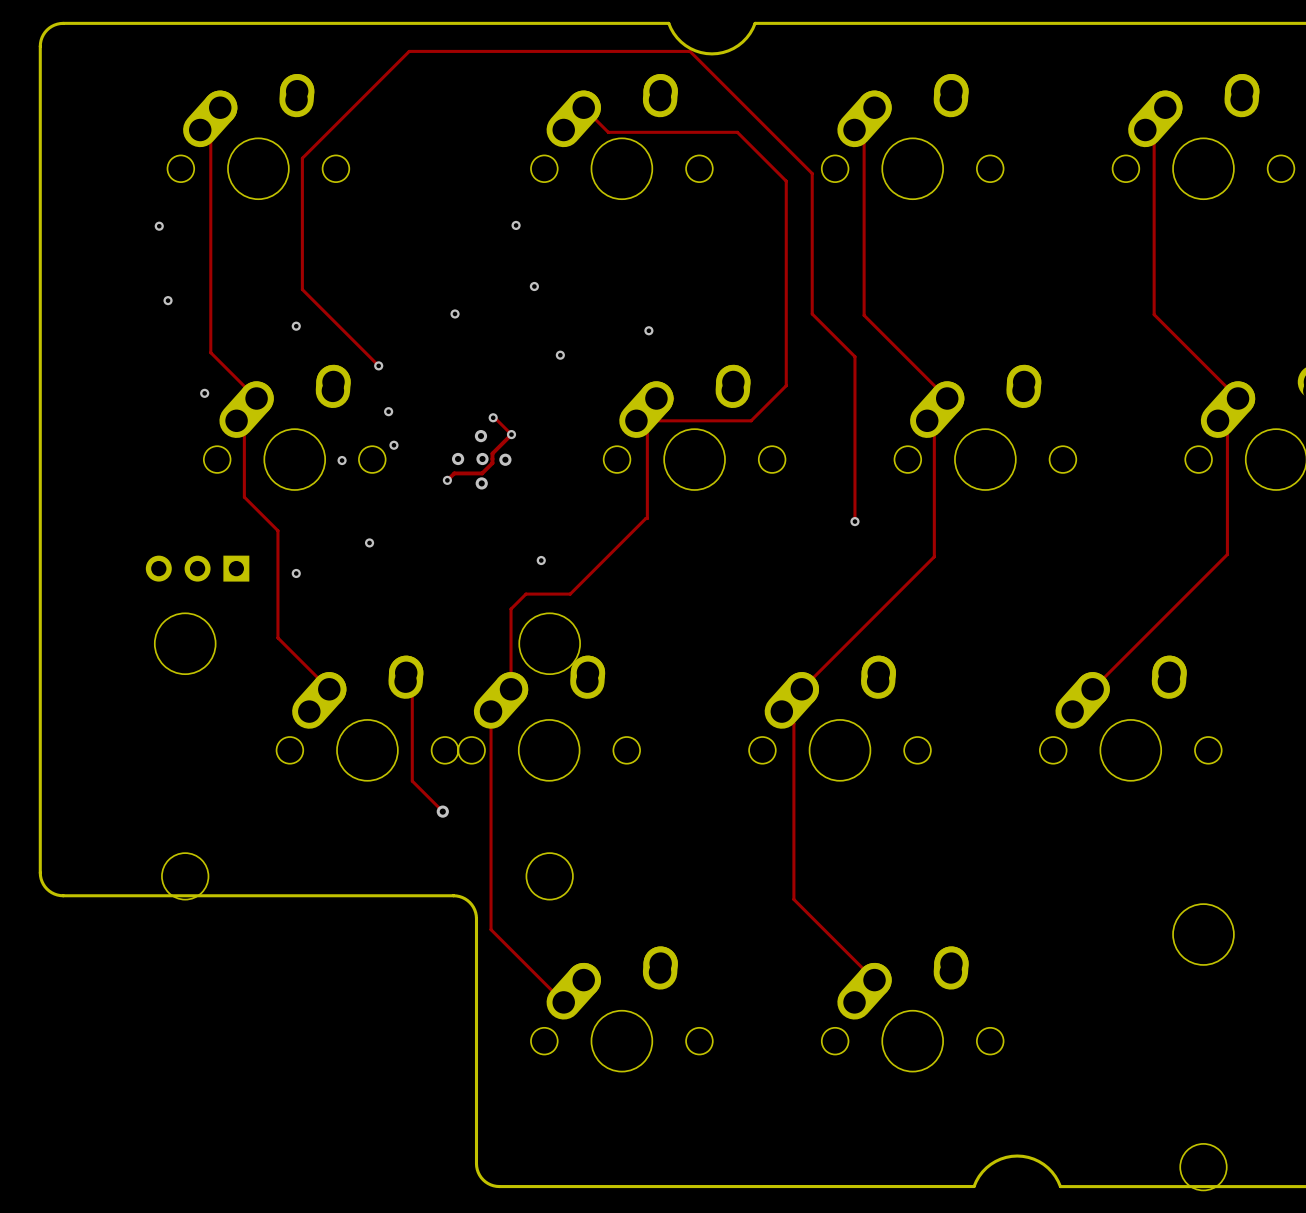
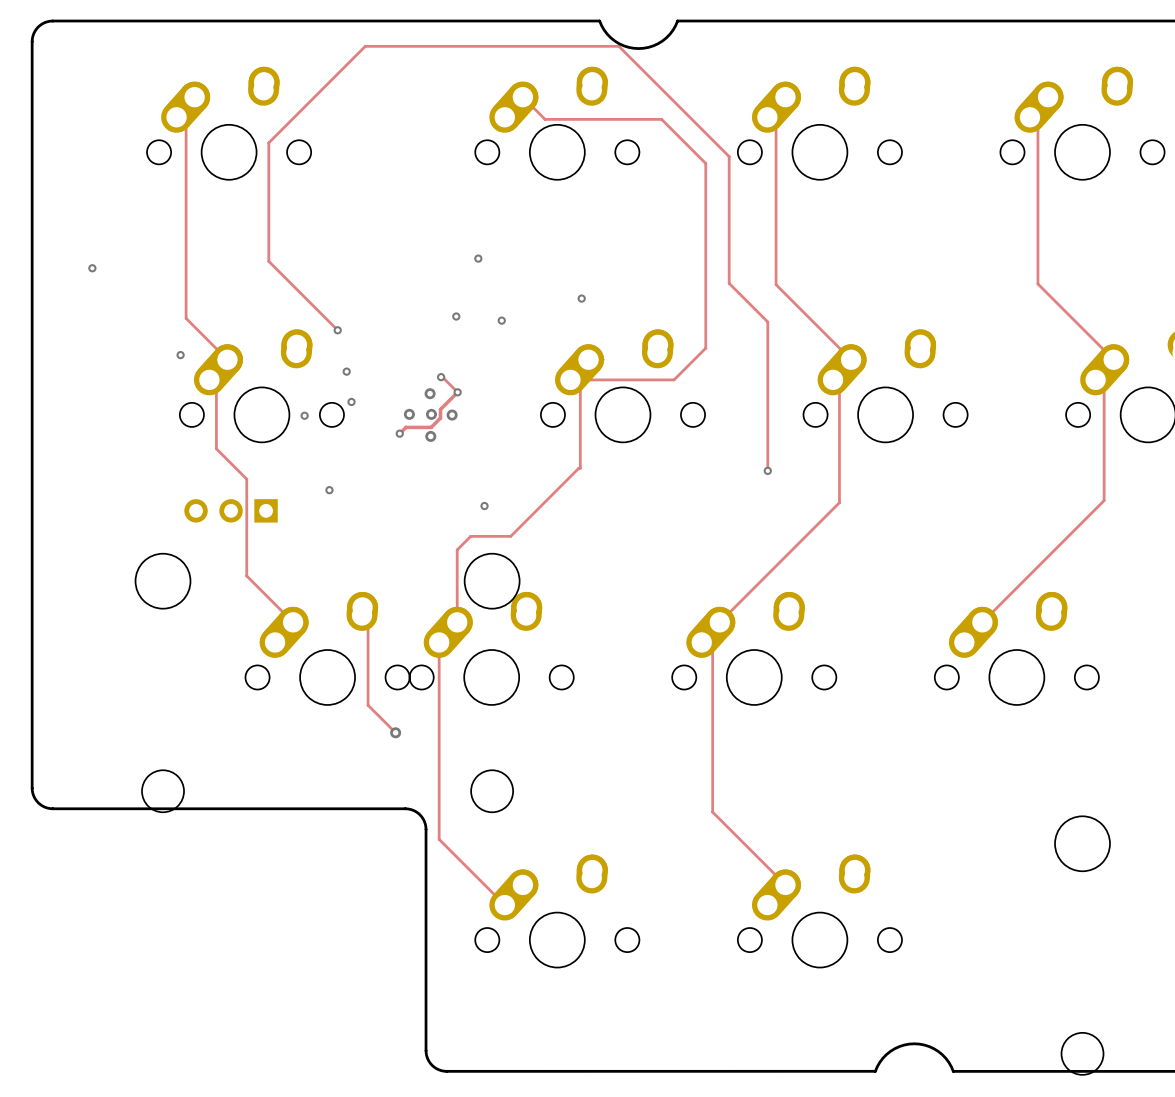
via: (516, 225) -> none
via: (159, 226) -> none
via: none -> (92, 268)
via: (168, 300) -> none
via: (455, 313) -> none
via: (296, 326) -> none
via: none -> (456, 316)
part position: (197, 568) -> (231, 510)
via: (296, 573) -> none

